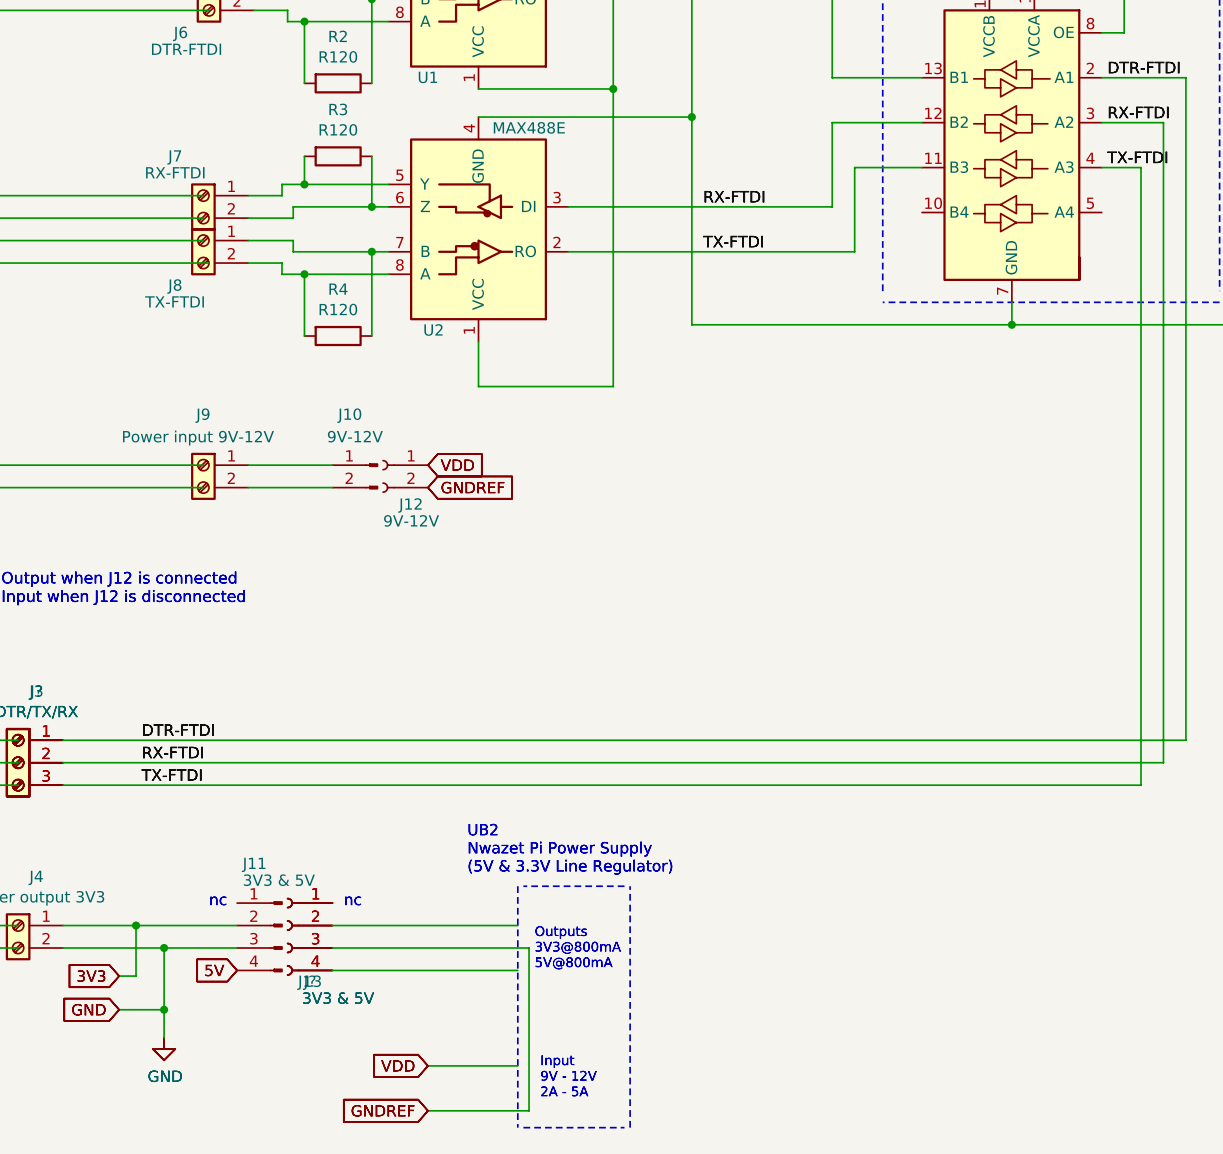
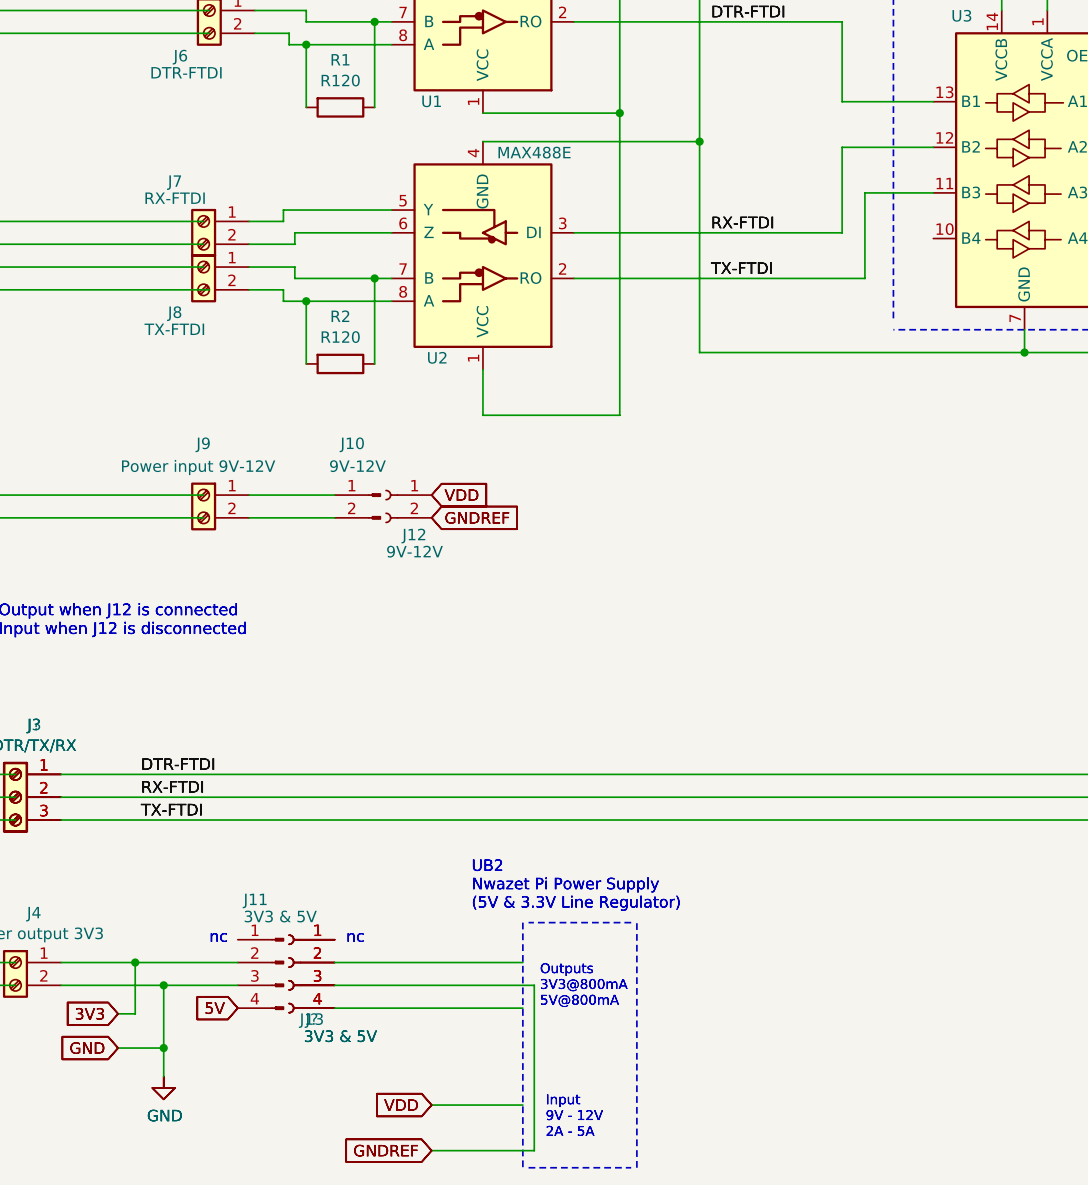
R2 name: R2 (338, 36) -> R1 (340, 59)
wire: (304, 156) (304, 184) -> none
R3: R120 (338, 156) -> none
wire: (371, 156) (371, 206) -> none
junction: (304, 184) -> none
junction: (371, 206) -> none
R4 name: R4 (338, 289) -> R2 (340, 316)

